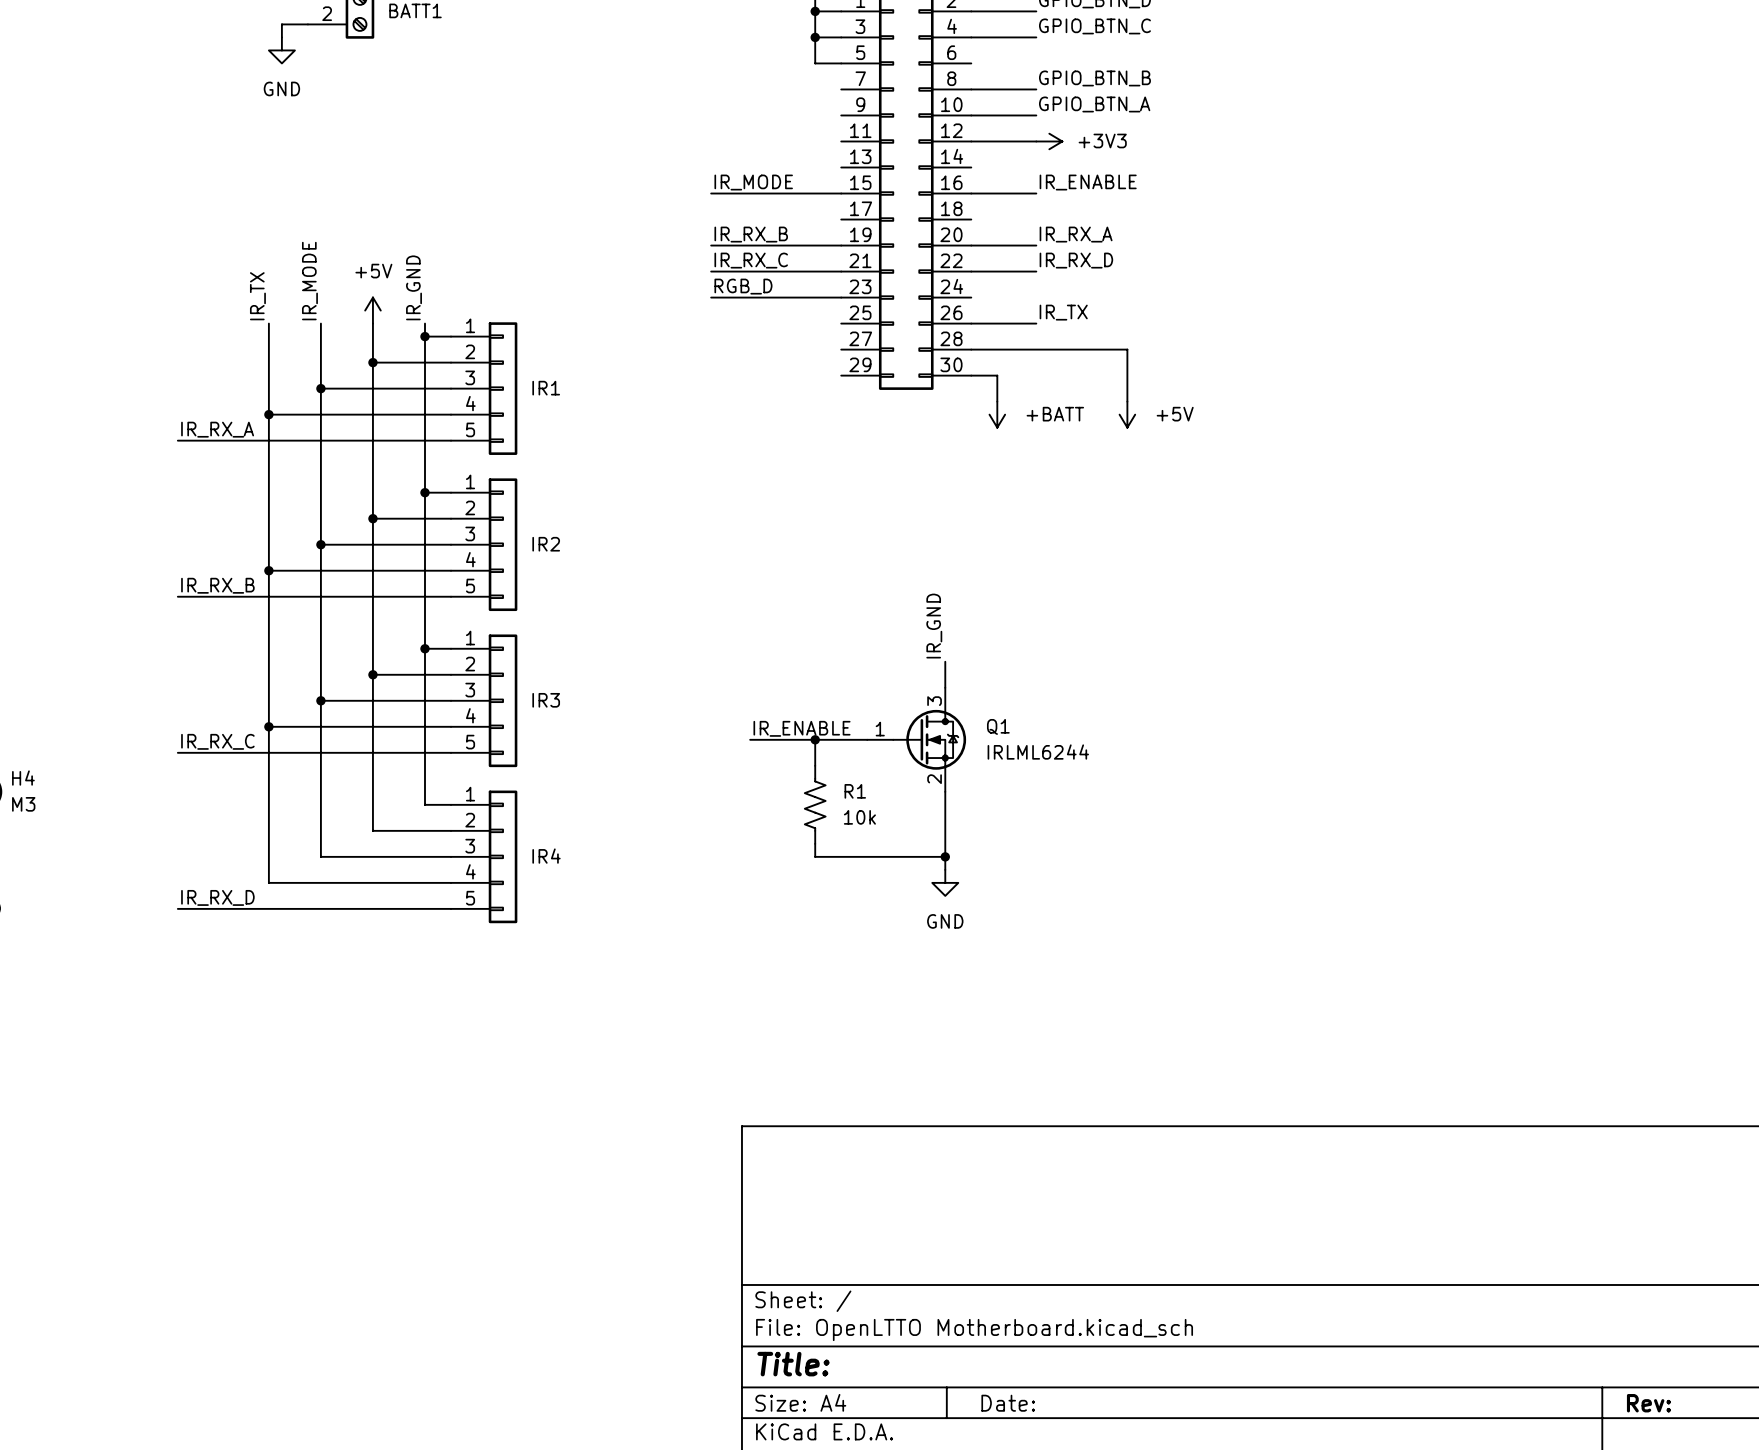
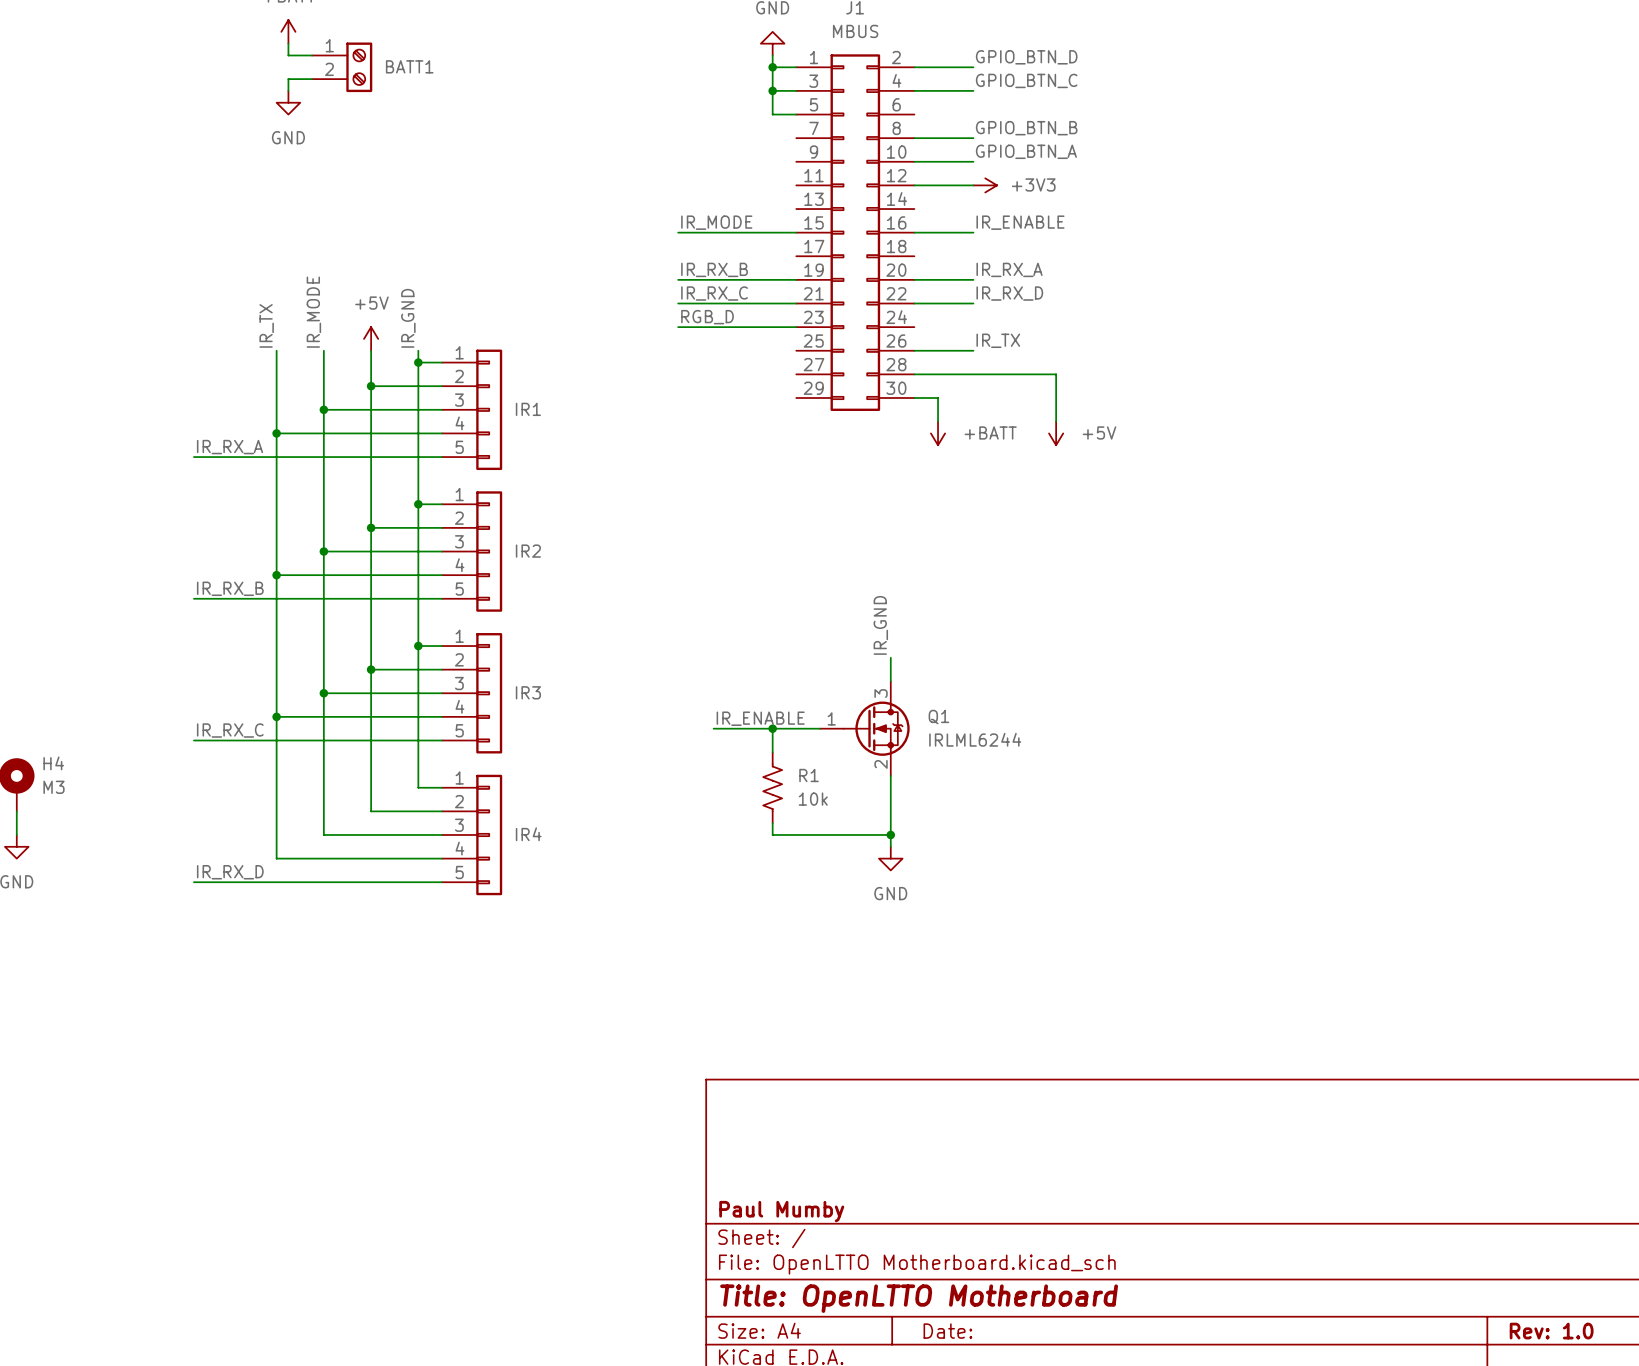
title block: none -> Paul Mumby (781, 1211)
title block: Title: (793, 1364) -> Title: OpenLTTO Motherboard (919, 1298)
title block: Rev: (1648, 1403) -> Rev: 1.0 (1551, 1331)

